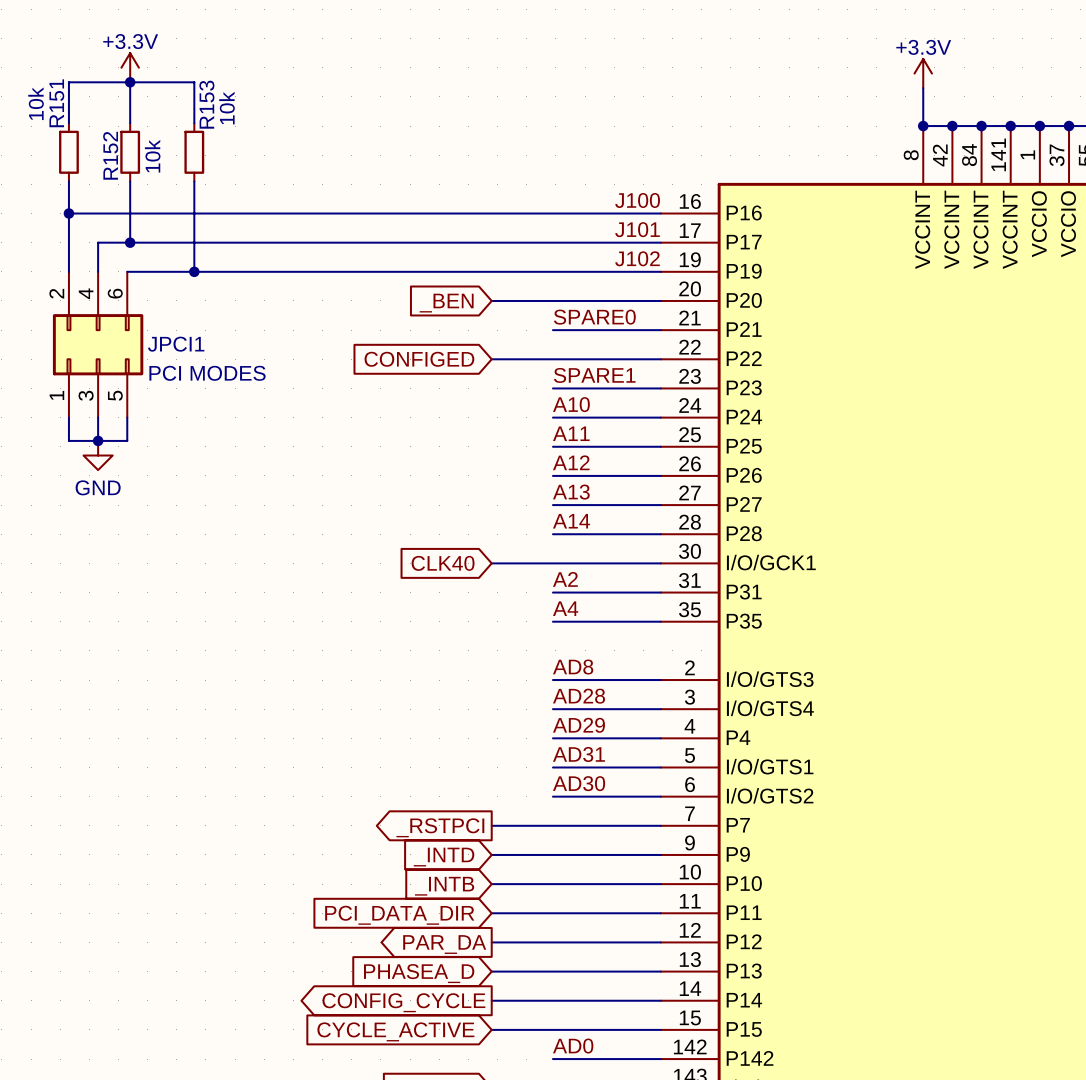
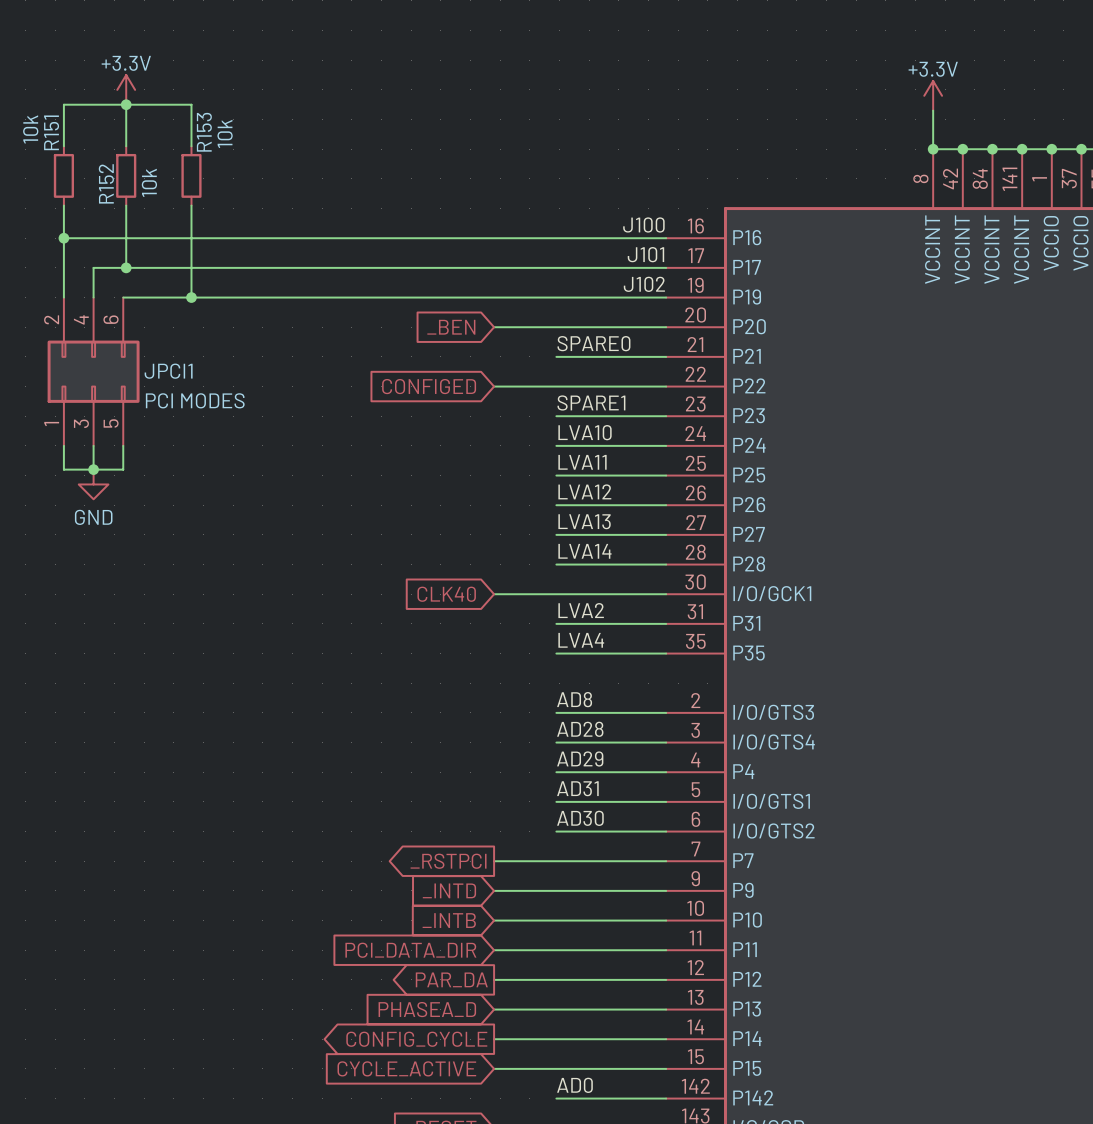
label: A10 (571, 404) -> LVA10 (585, 432)
label: A11 (571, 433) -> LVA11 (582, 462)
label: A12 (571, 462) -> LVA12 (584, 491)
label: A13 (571, 492) -> LVA13 (584, 521)
label: A14 (571, 521) -> LVA14 (584, 551)
label: A2 (565, 579) -> LVA2 (581, 610)
label: A4 (565, 608) -> LVA4 (581, 640)

